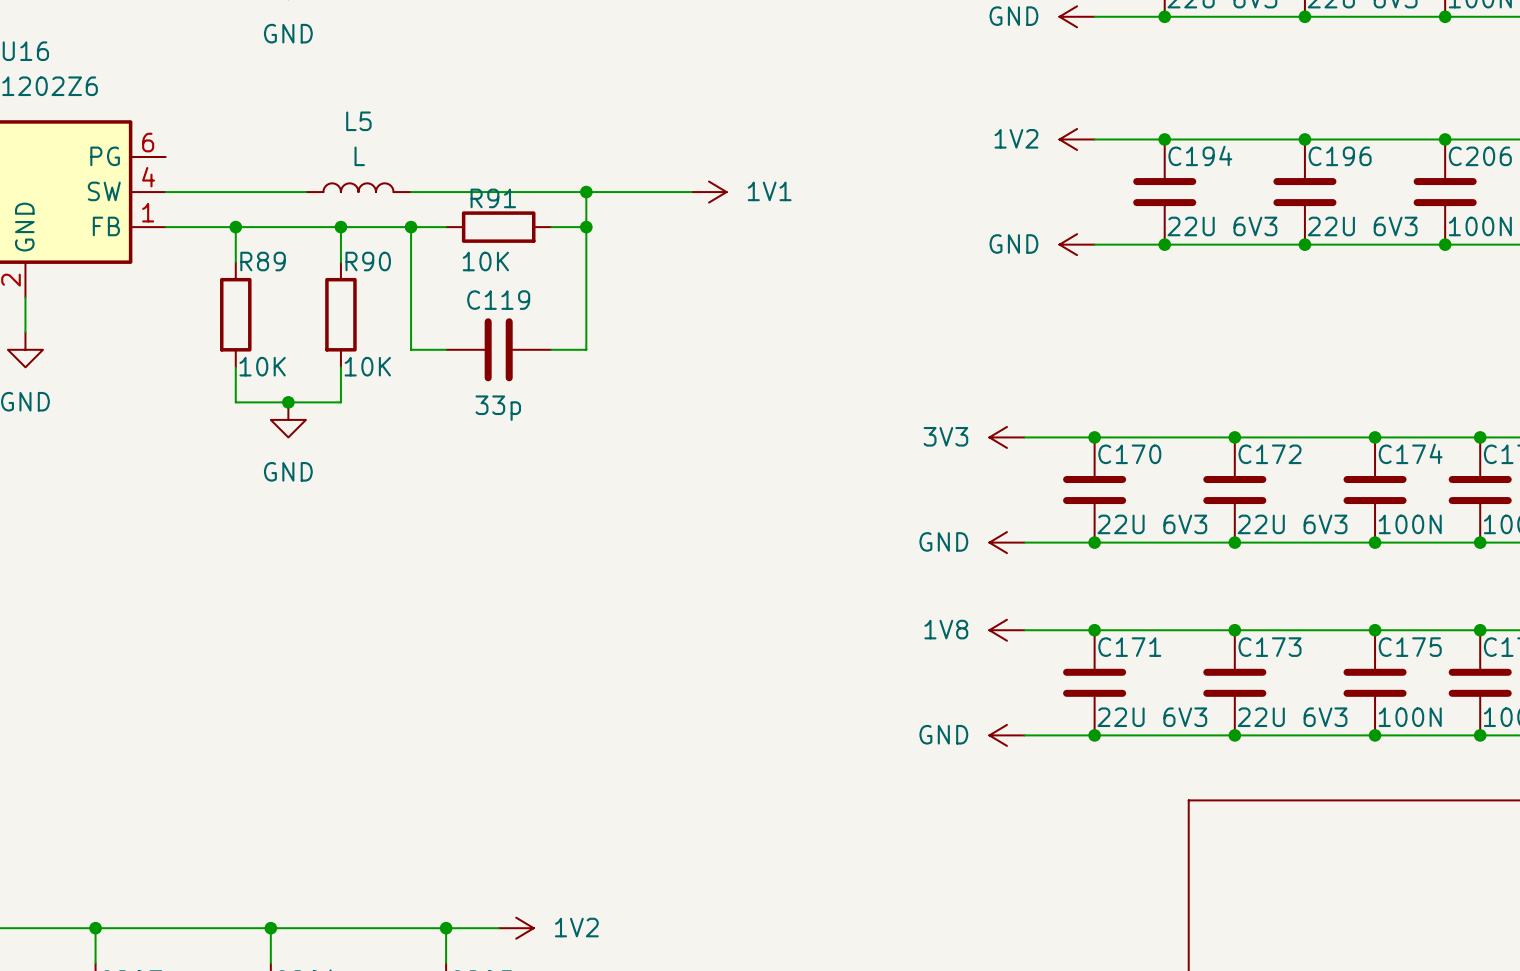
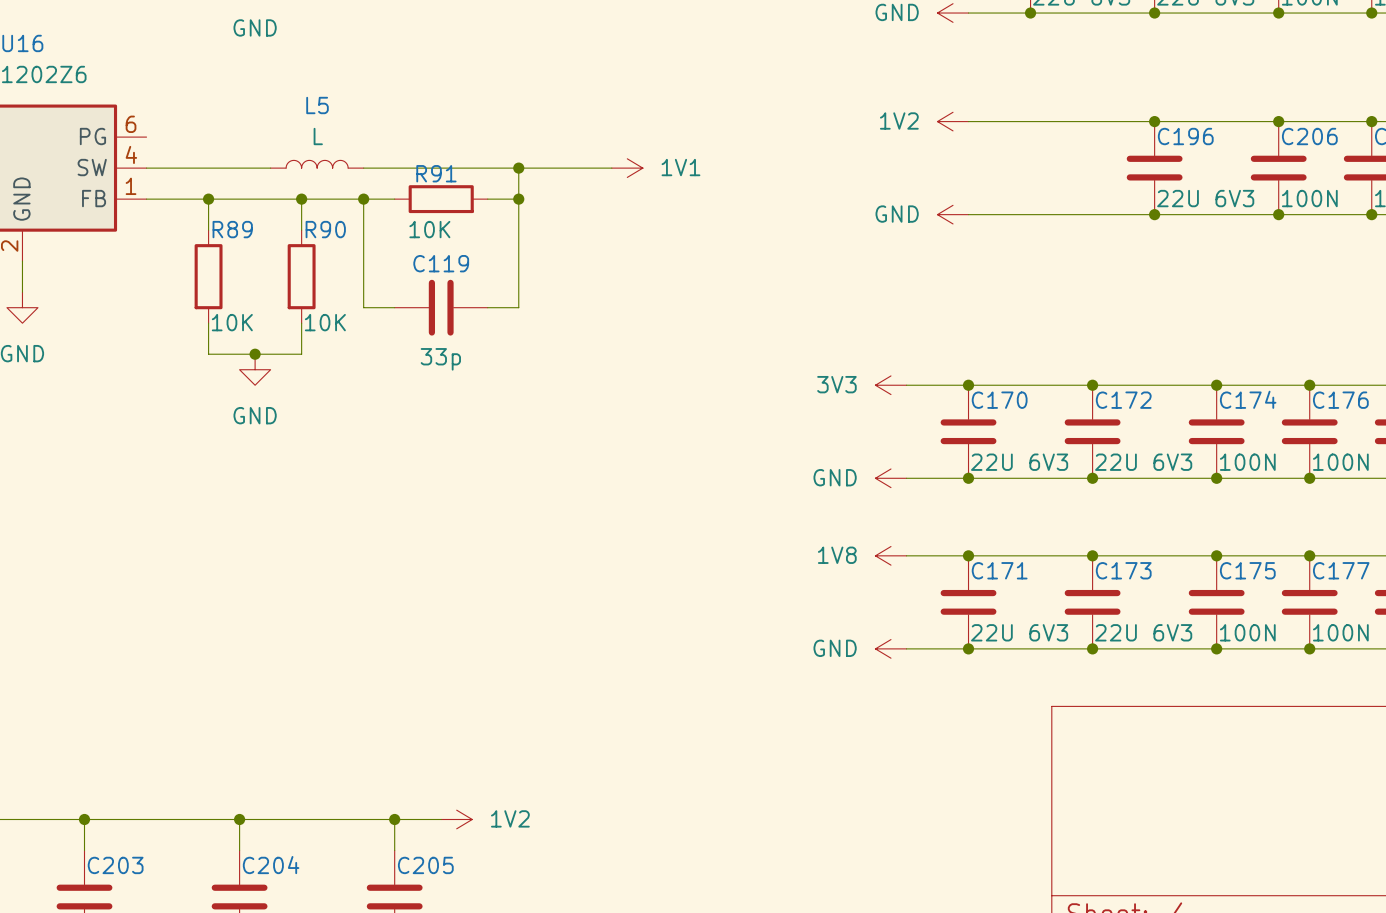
junction: (1164, 139) -> none
C194: 22U 6V3 (1164, 192) -> none
junction: (1164, 244) -> none

